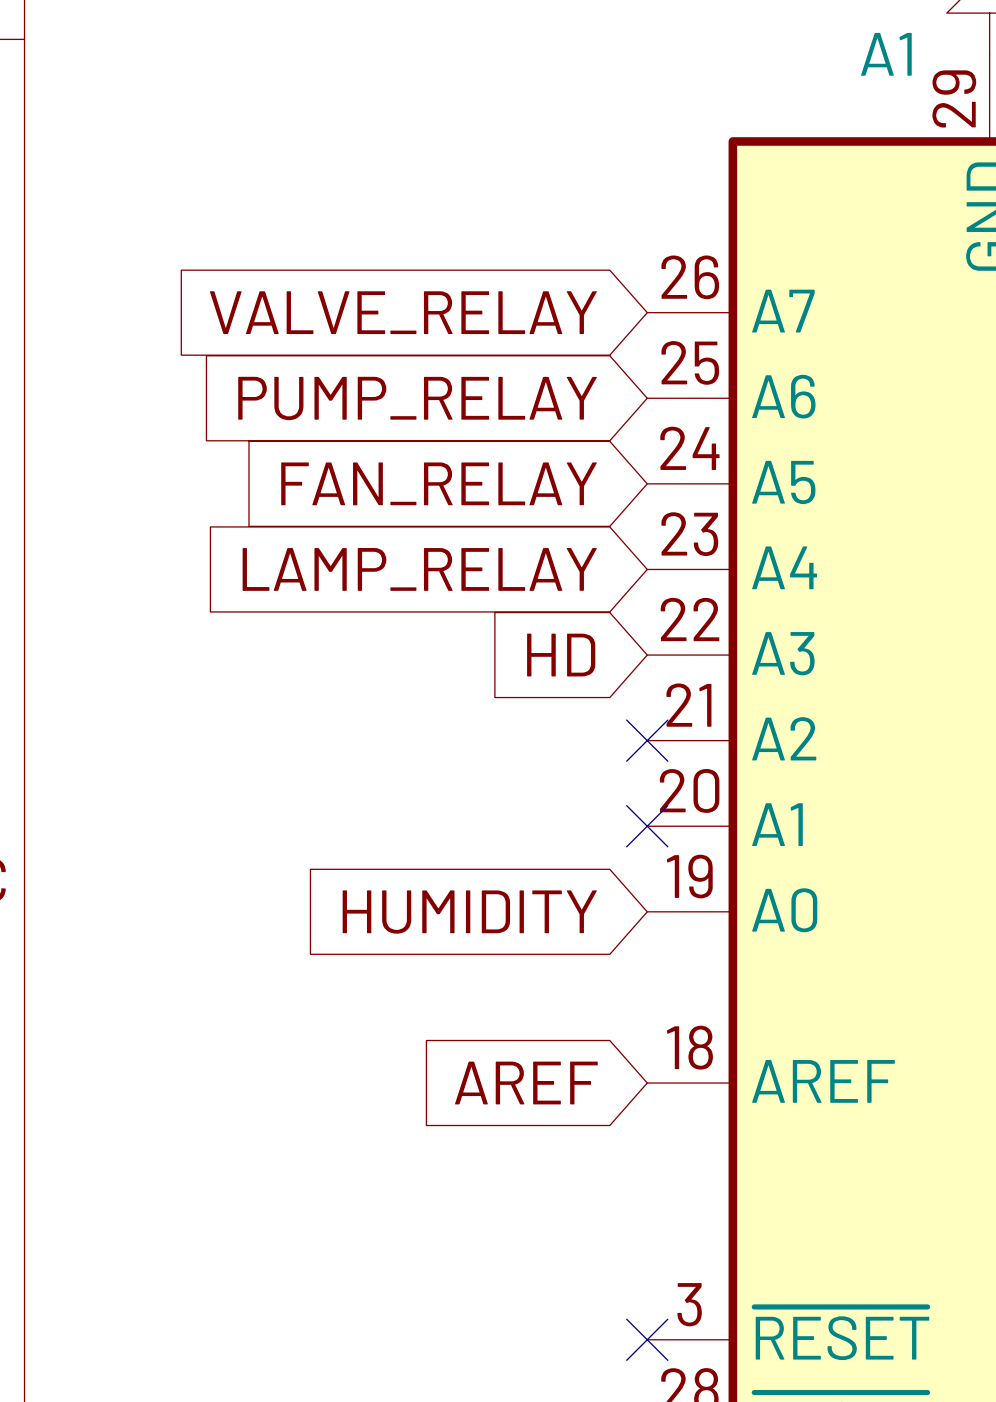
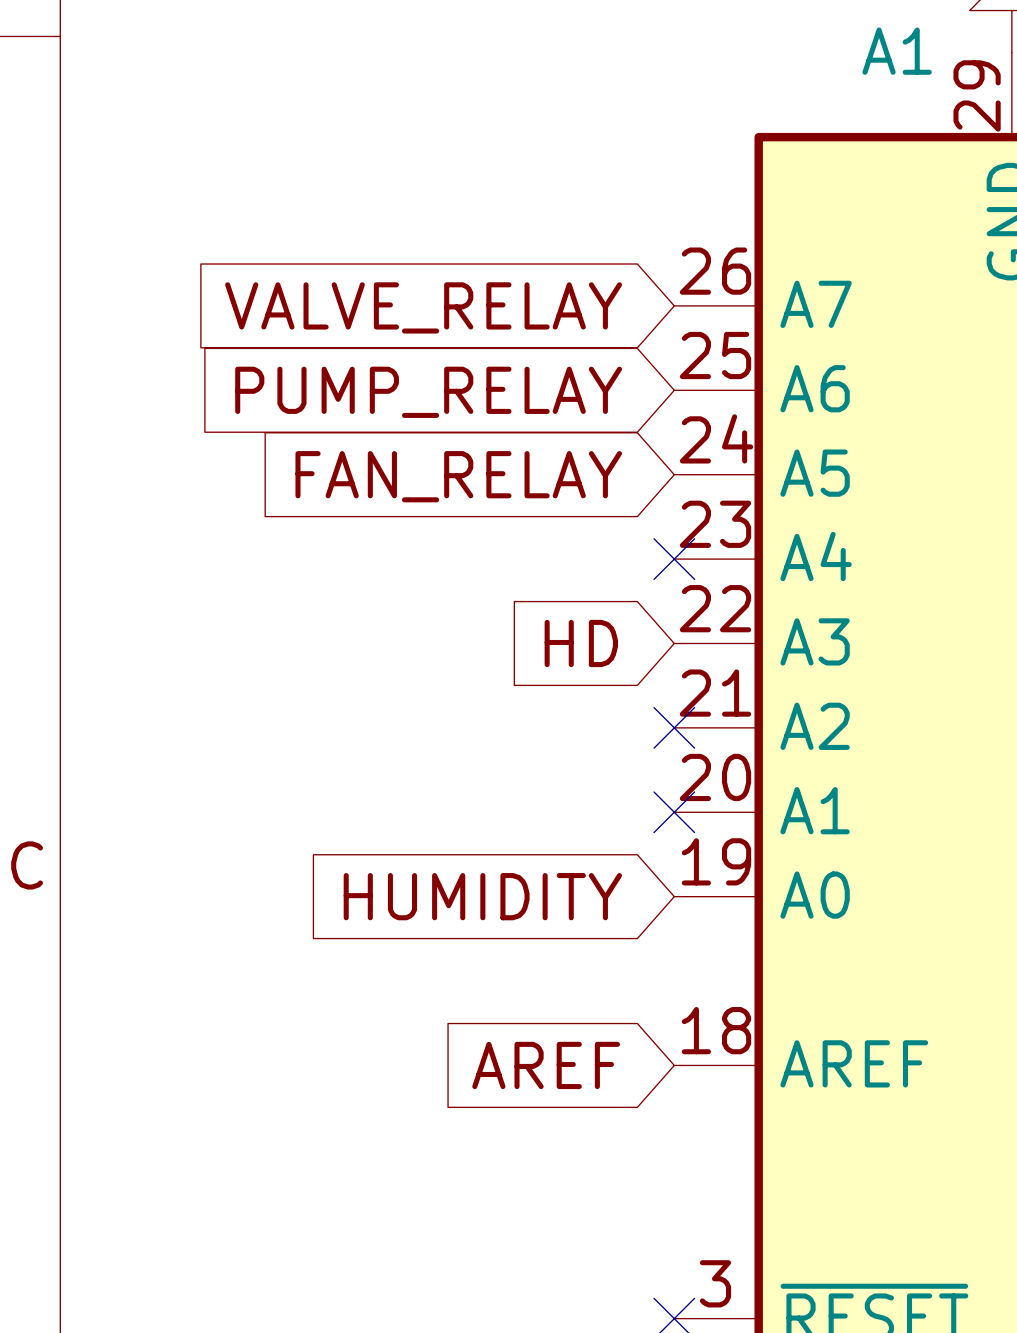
global label: LAMP_RELAY (419, 569) -> none
no-connect mark: none -> (674, 559)

